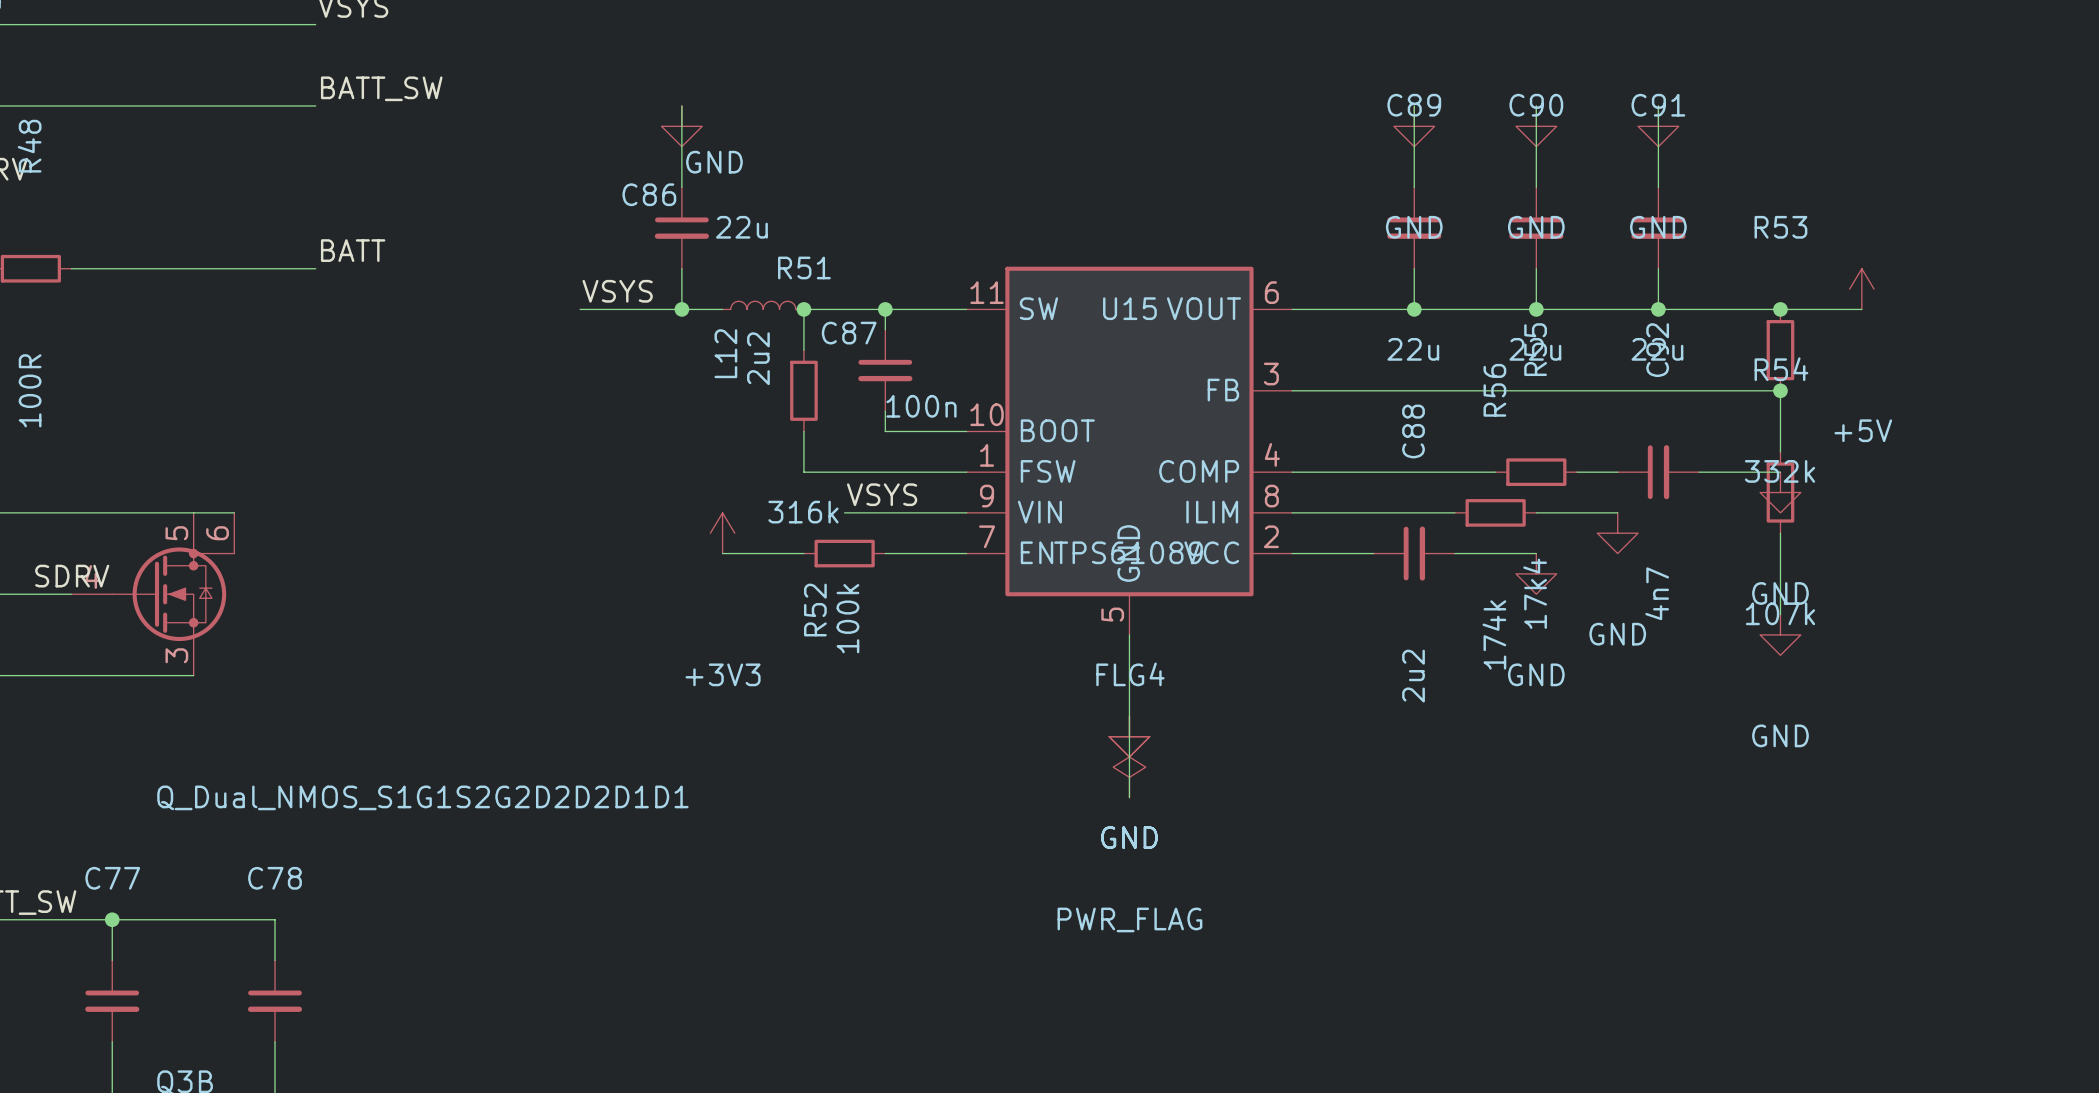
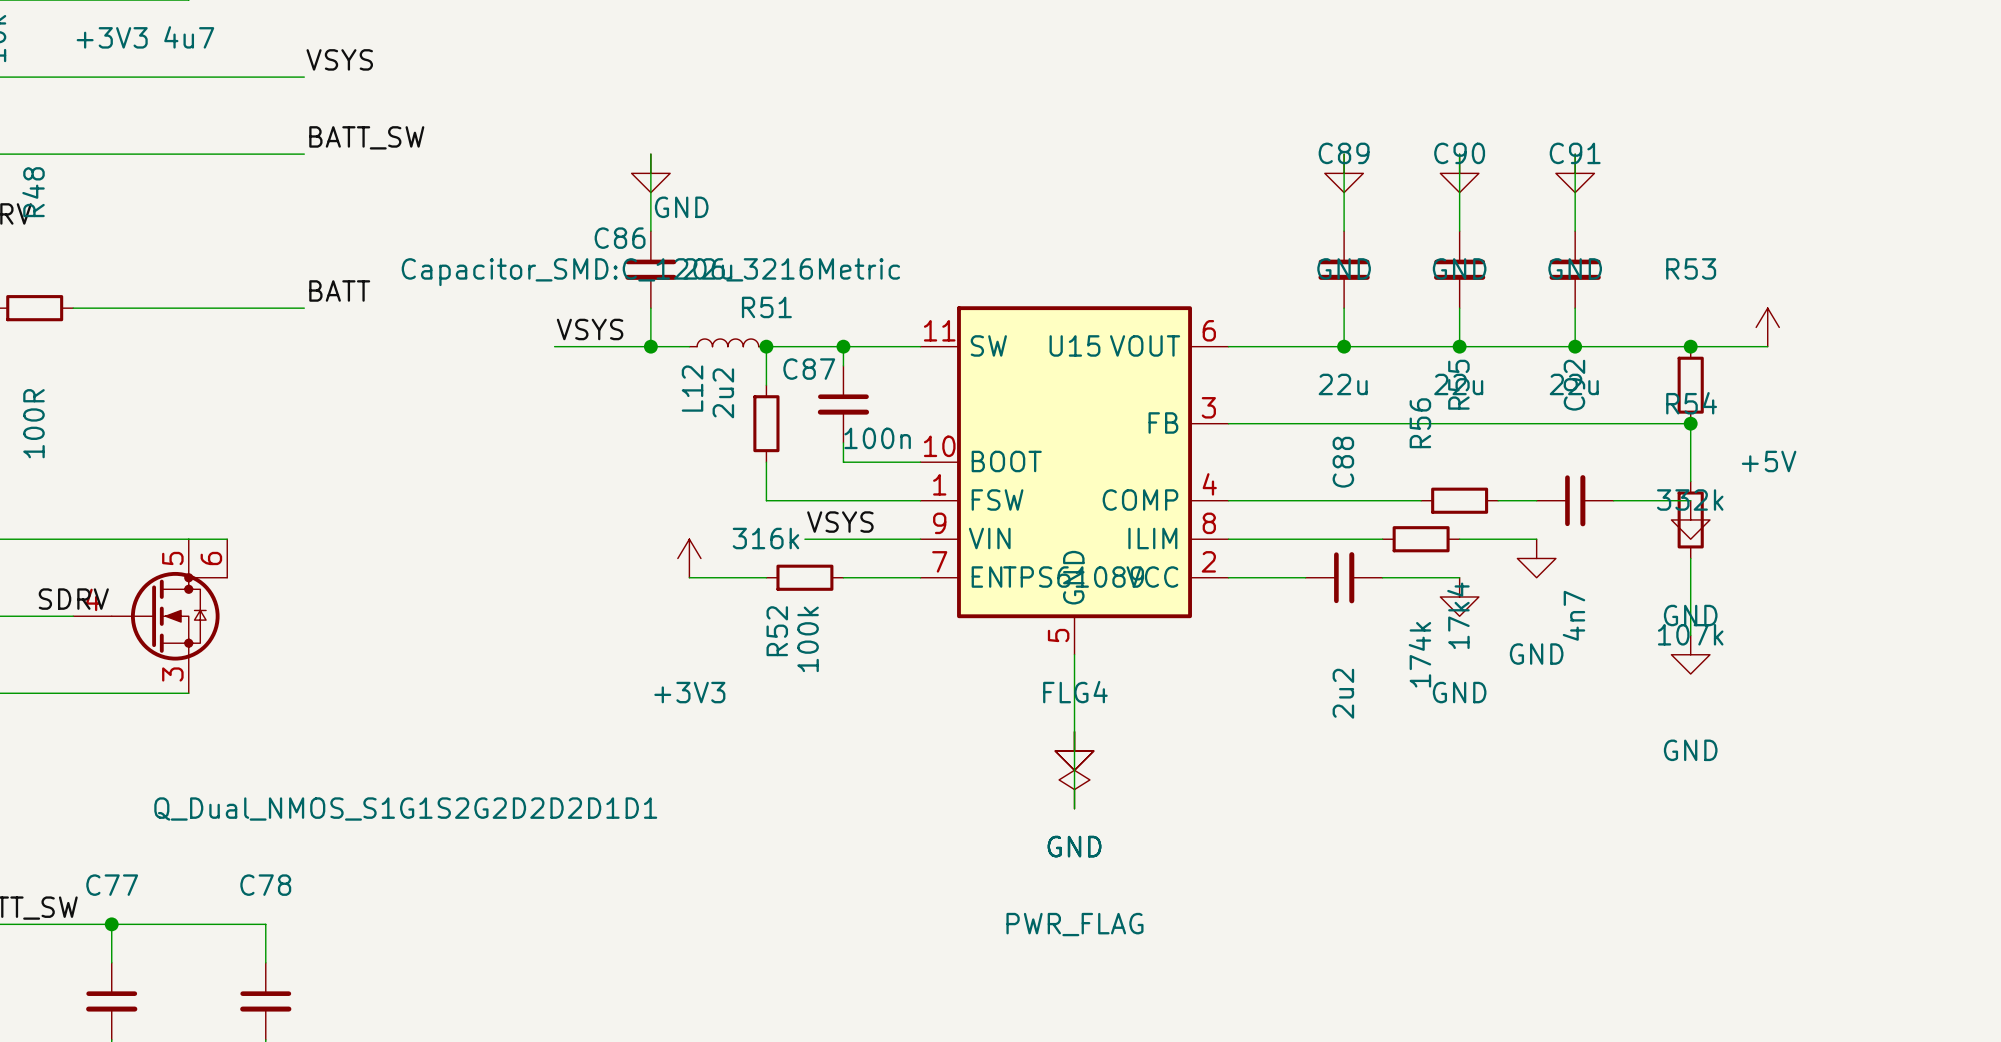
C86 text: none -> Capacitor_SMD:C_1206_3216Metric (650, 272)

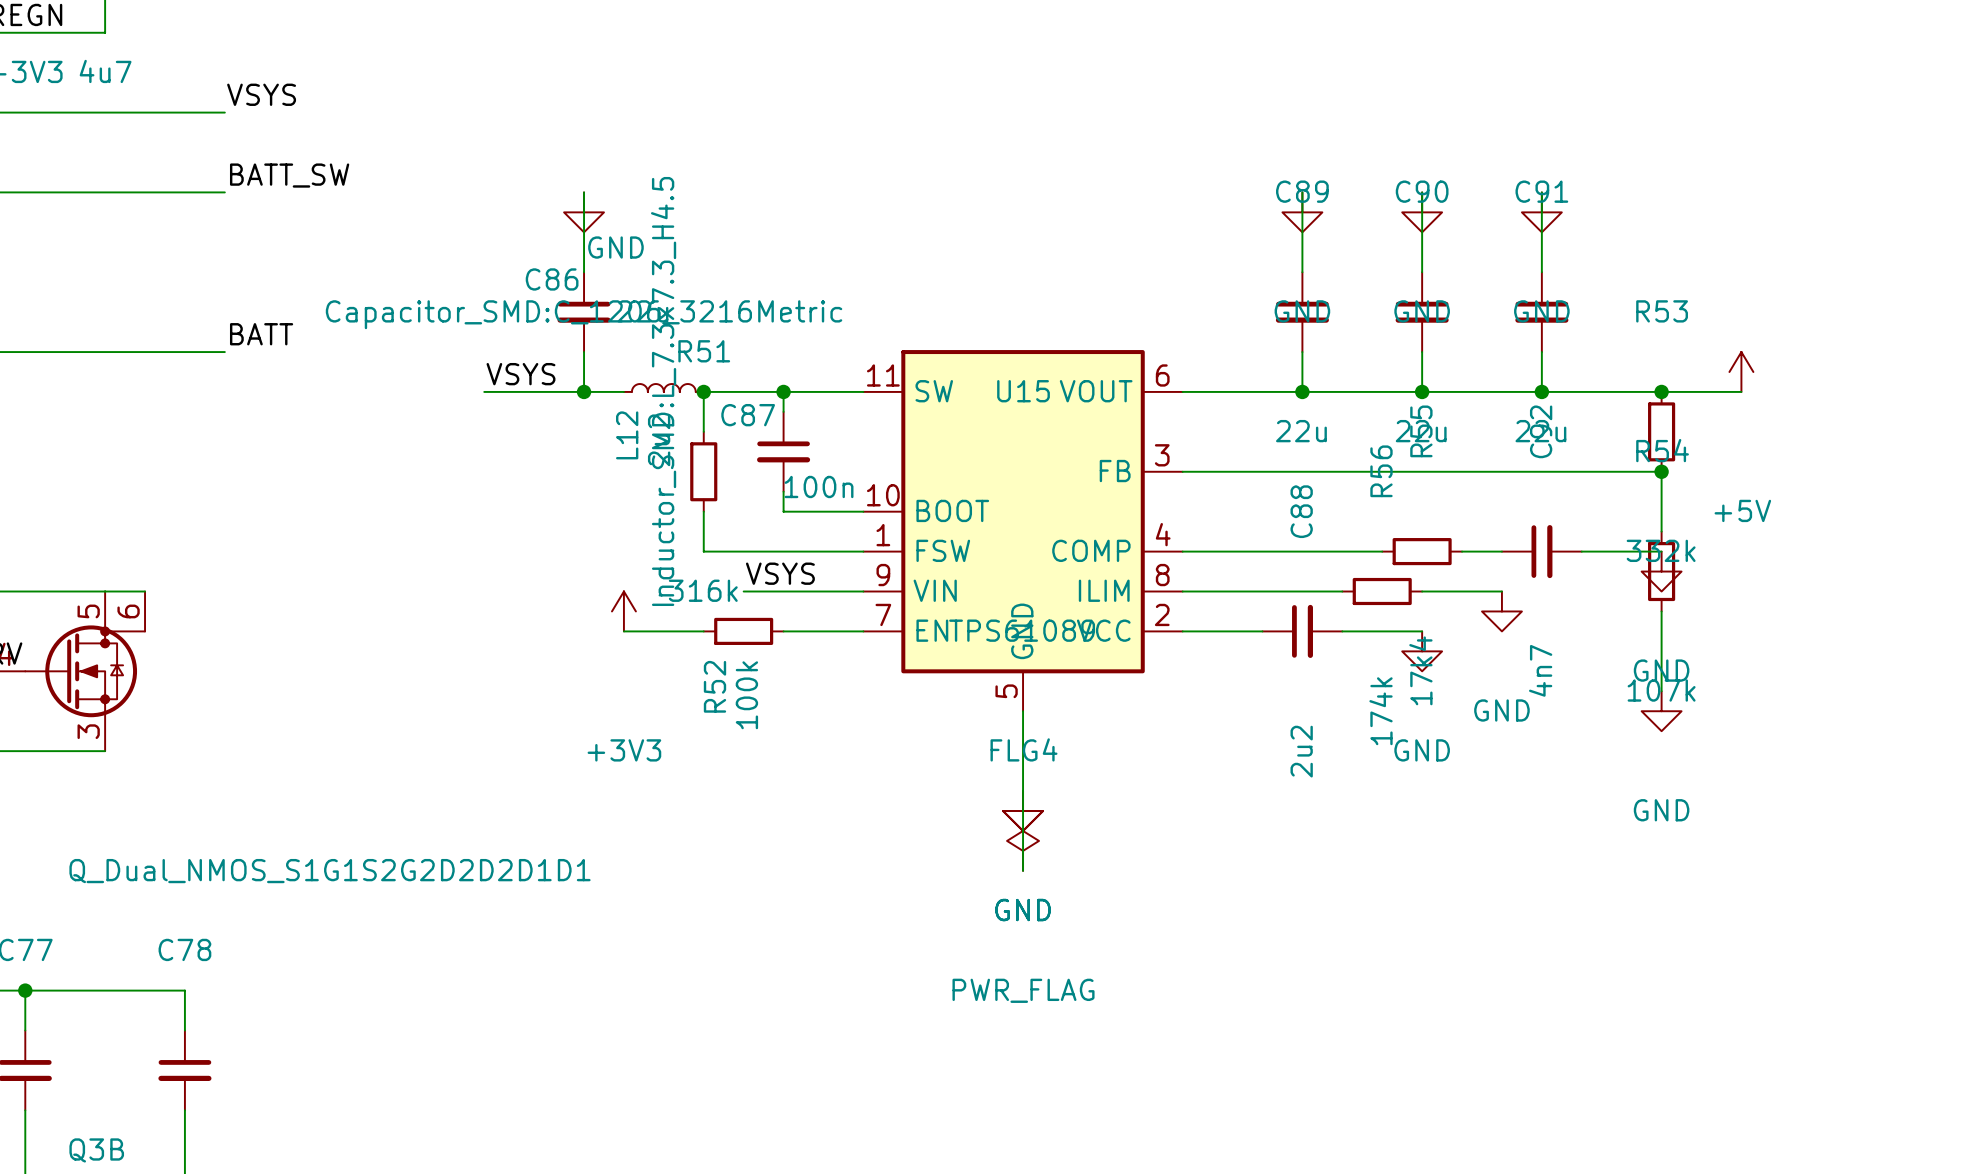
L12 text: none -> Inductor_SMD:L_7.3x7.3_H4.5 (663, 391)

